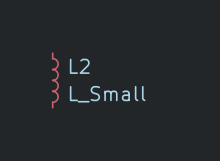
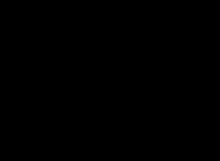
L2: L_Small (55, 80) -> none

